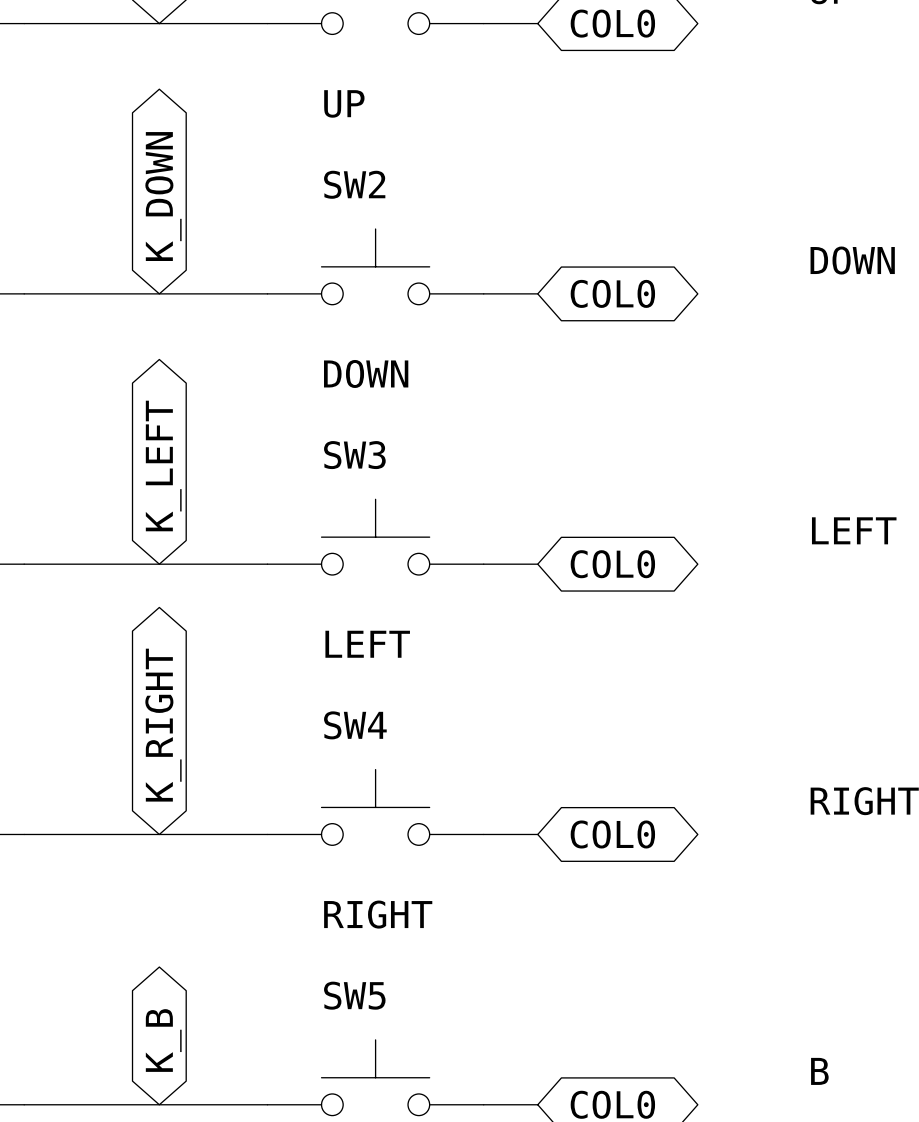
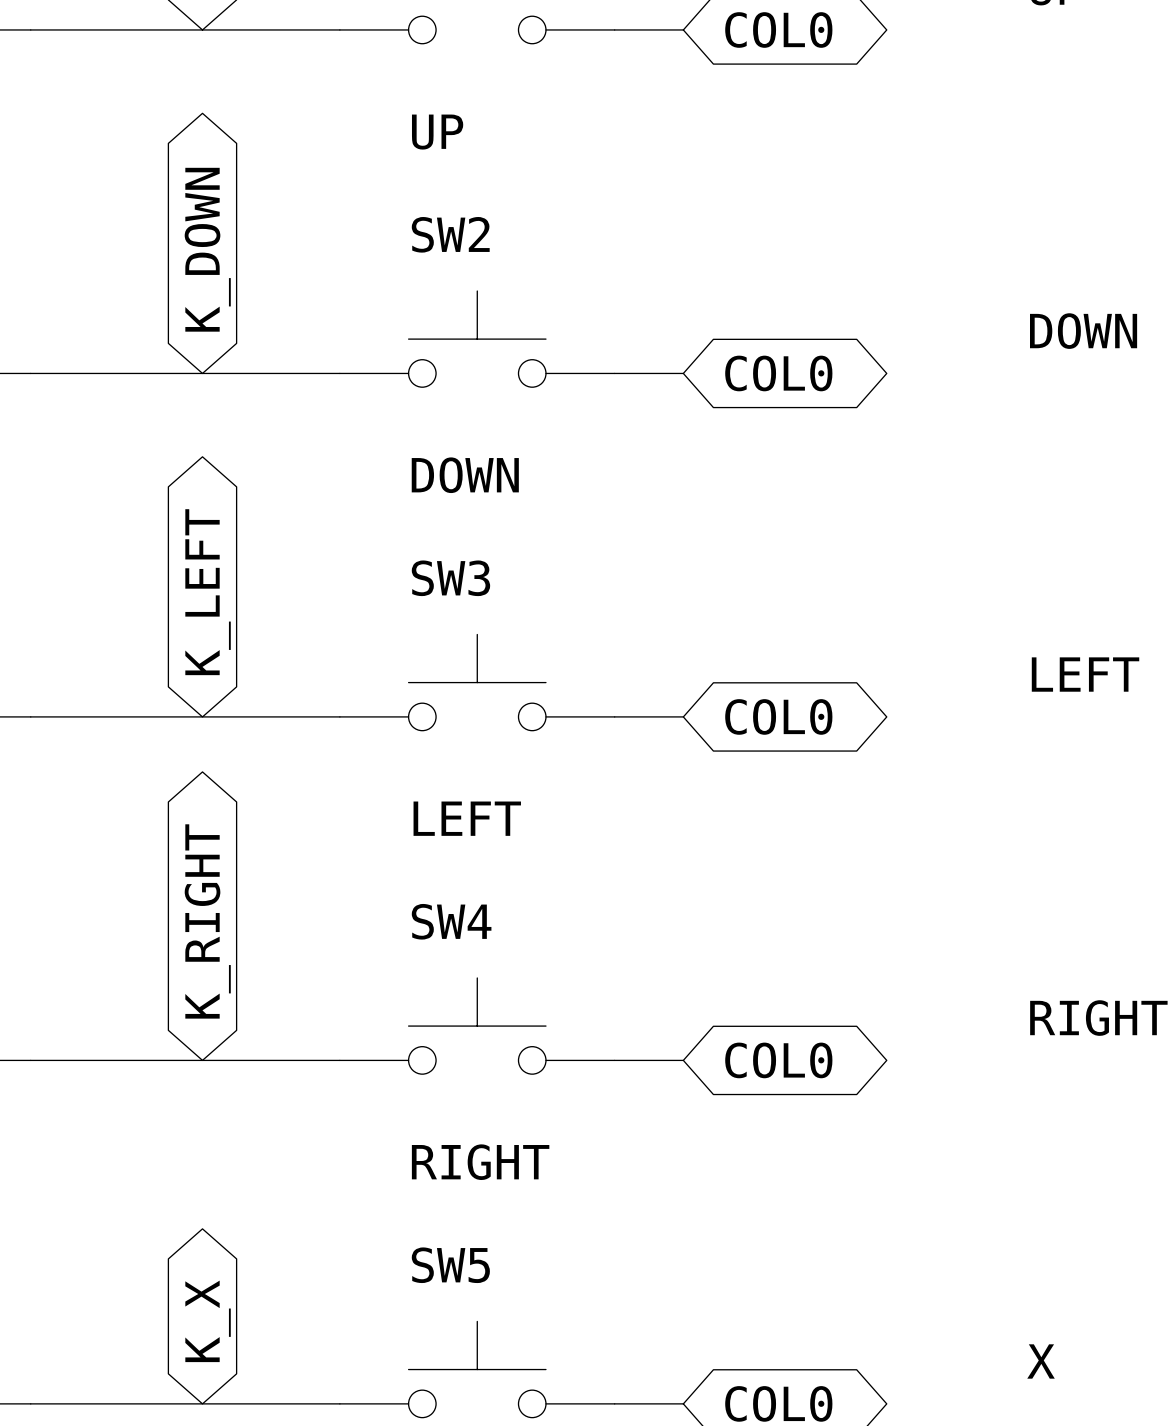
global label: K_B (163, 1040) -> K_X (208, 1321)
text: B (819, 1071) -> X (1041, 1361)

